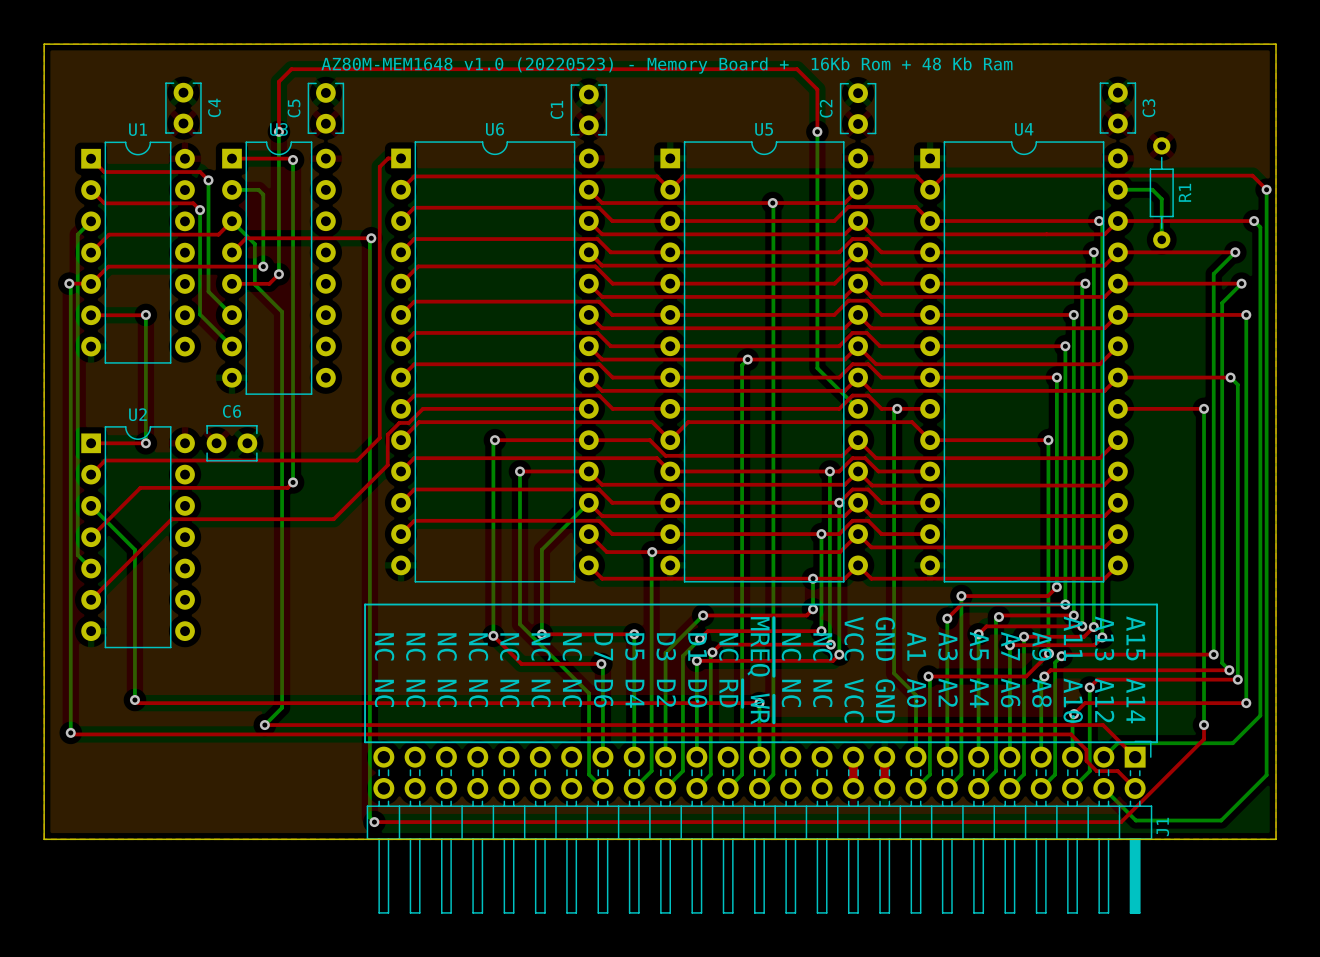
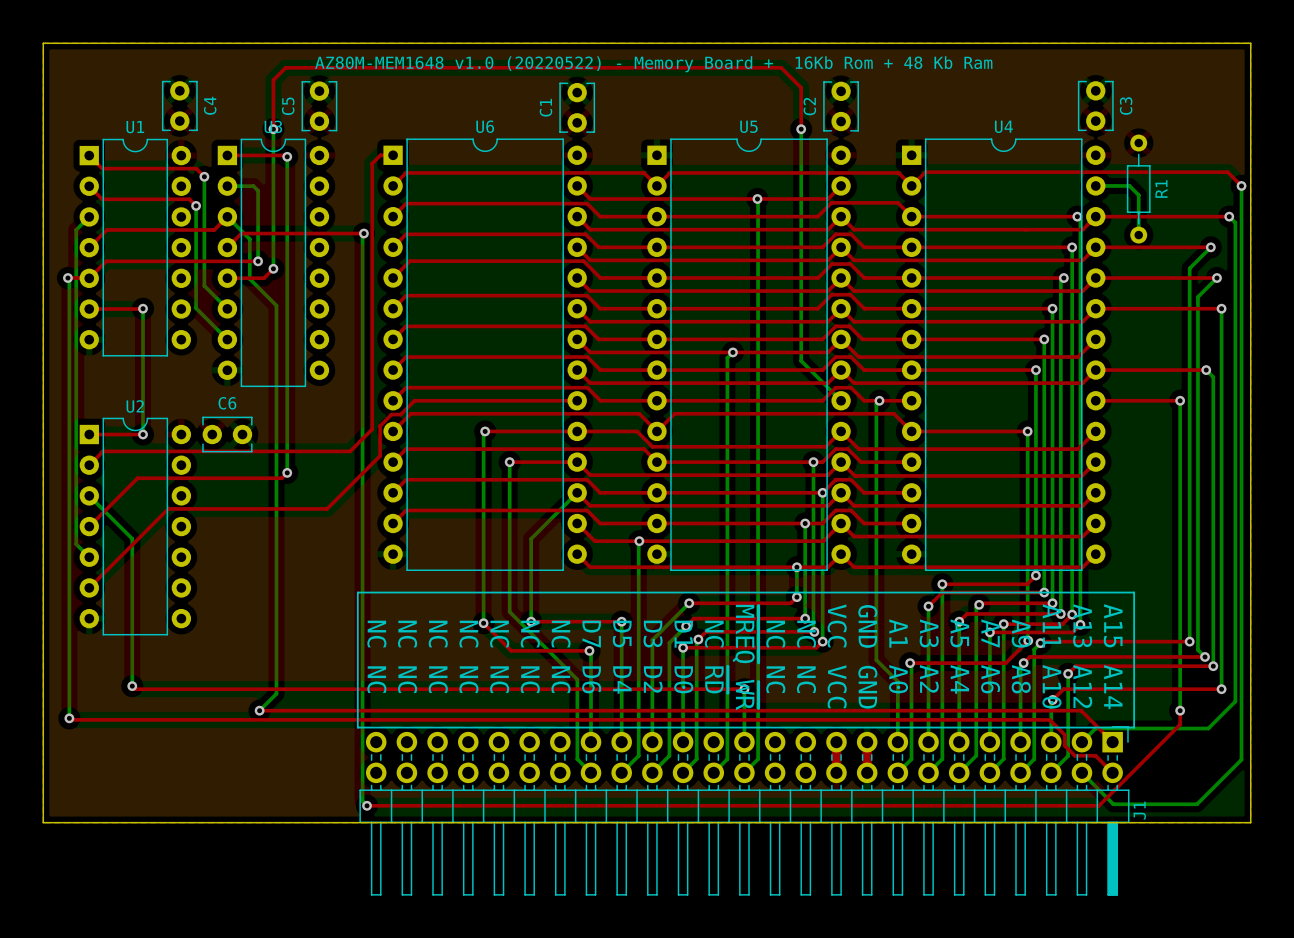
text: AZ80M-MEM1648 v1.0 (20220523) - Memory Board + 16Kb Rom + 48 Kb Ram (667, 65) -> AZ80M-MEM1648 v1.0 (20220522) - Memory Board + 16Kb Rom + 48 Kb Ram (653, 64)

